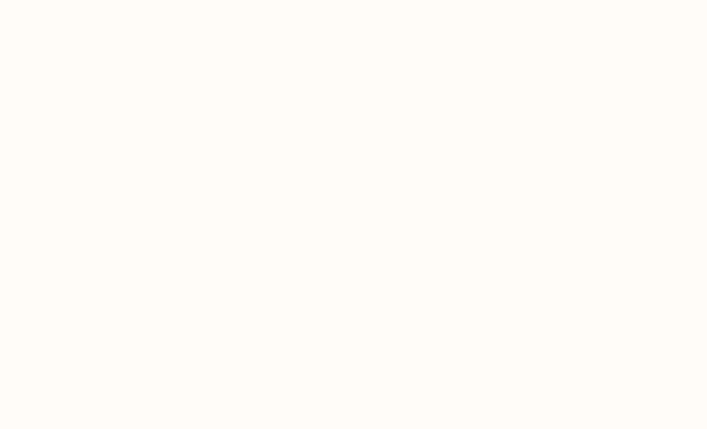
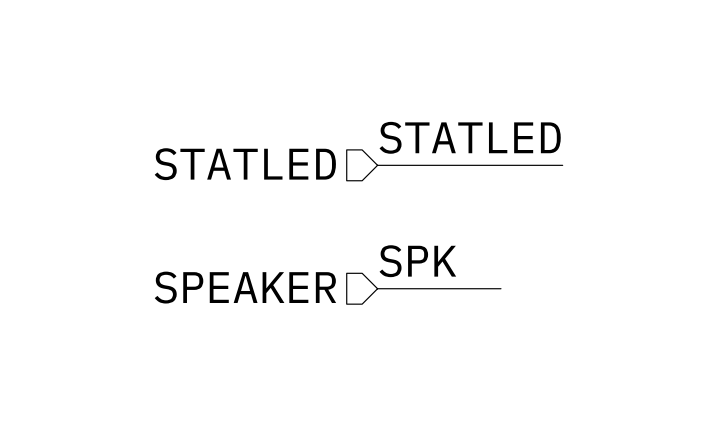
label: none -> STATLED (470, 137)
hierarchical label: none -> STATLED (245, 164)
wire: none -> (377, 165) (562, 165)
label: none -> SPK (417, 261)
hierarchical label: none -> SPEAKER (245, 287)
wire: none -> (377, 288) (500, 288)

